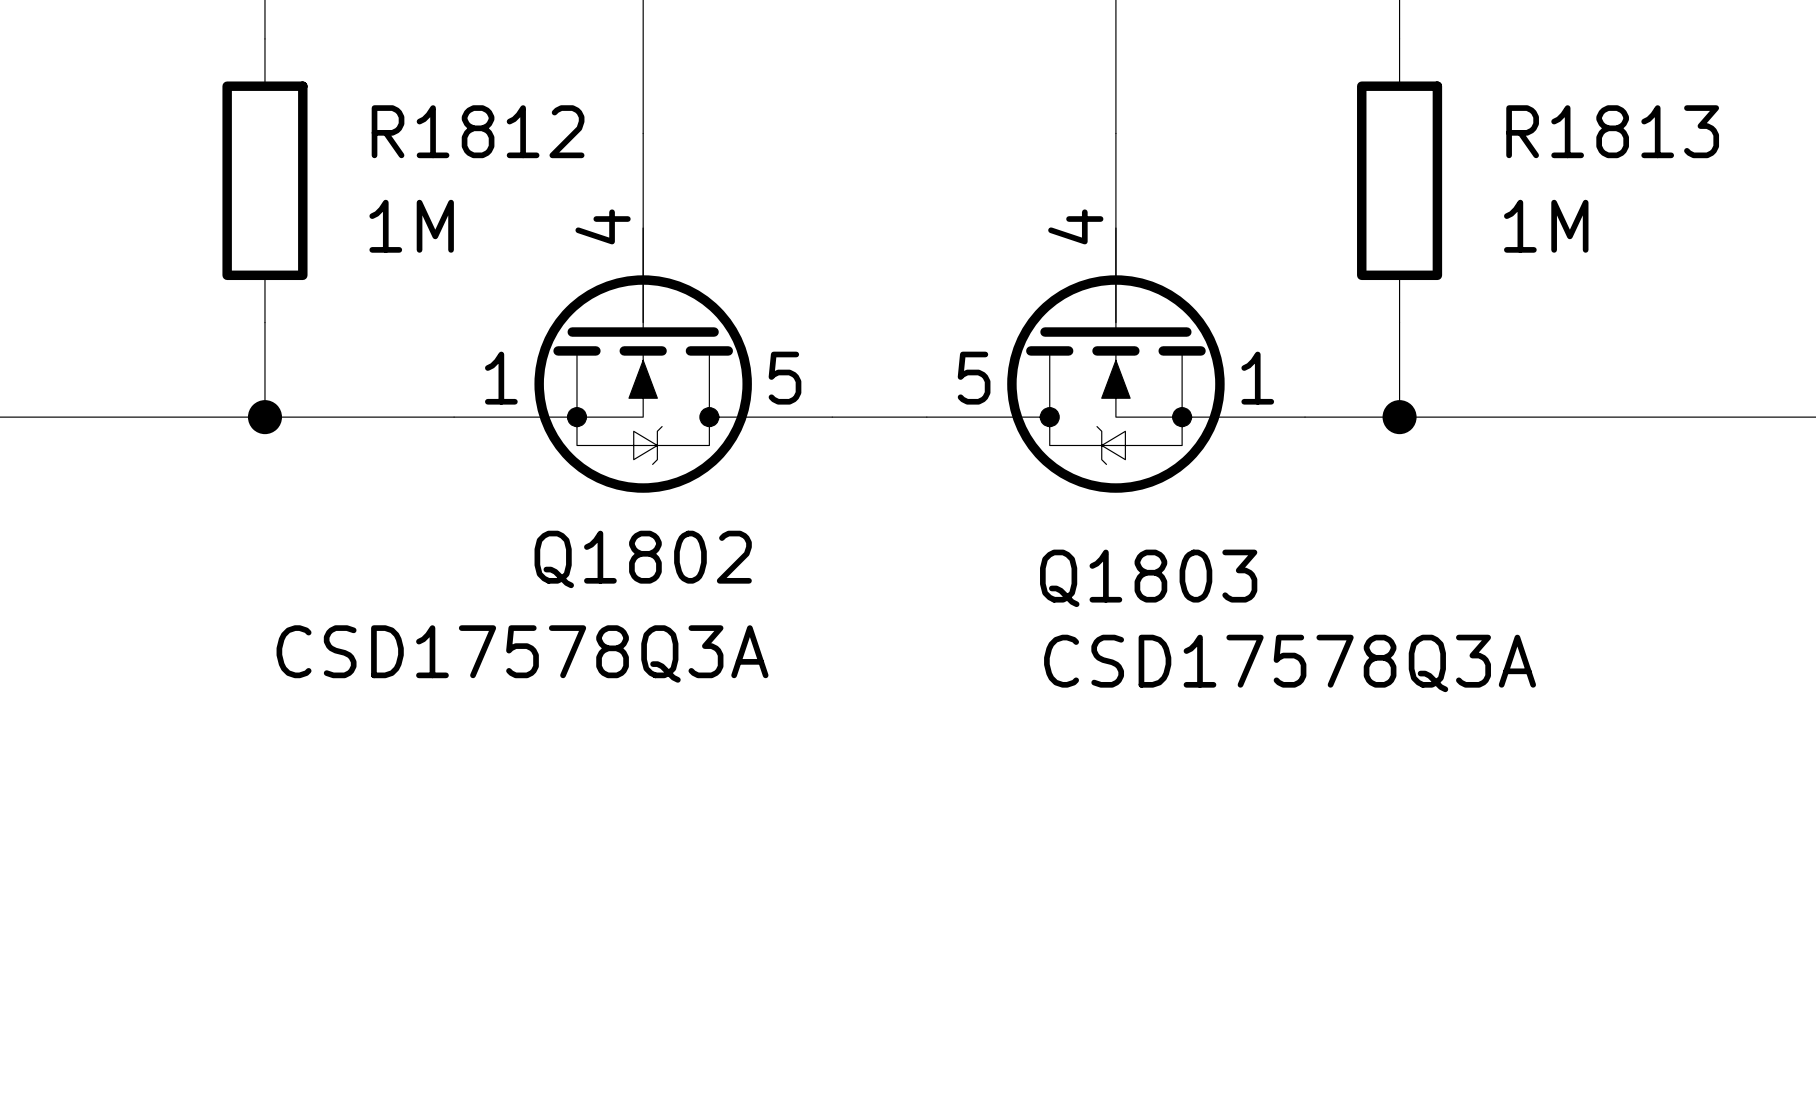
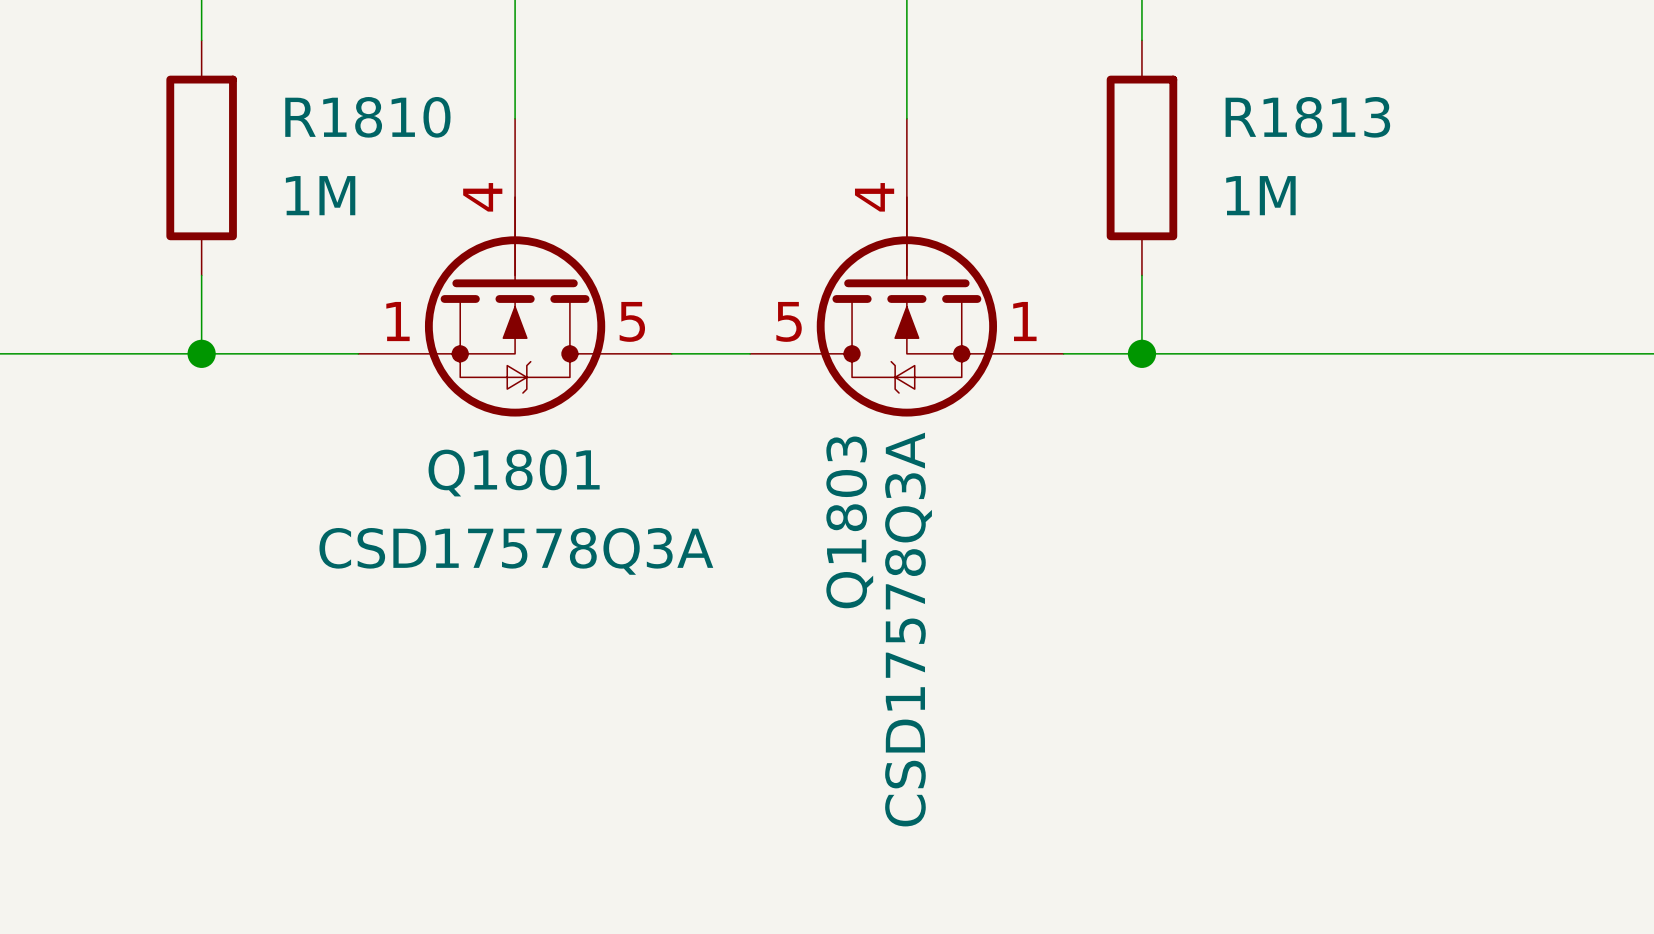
R1812 name: R1812 (478, 131) -> R1810 (367, 117)
Q1802 name: Q1802 (643, 559) -> Q1801 (514, 473)
Q1803 name rotation: 0° (1148, 578) -> 90° counterclockwise (849, 522)
Q1802 value position: CSD17578Q3A (522, 653) -> CSD17578Q3A (516, 551)
Q1803 value rotation: 0° (1290, 663) -> 90° counterclockwise (908, 629)

